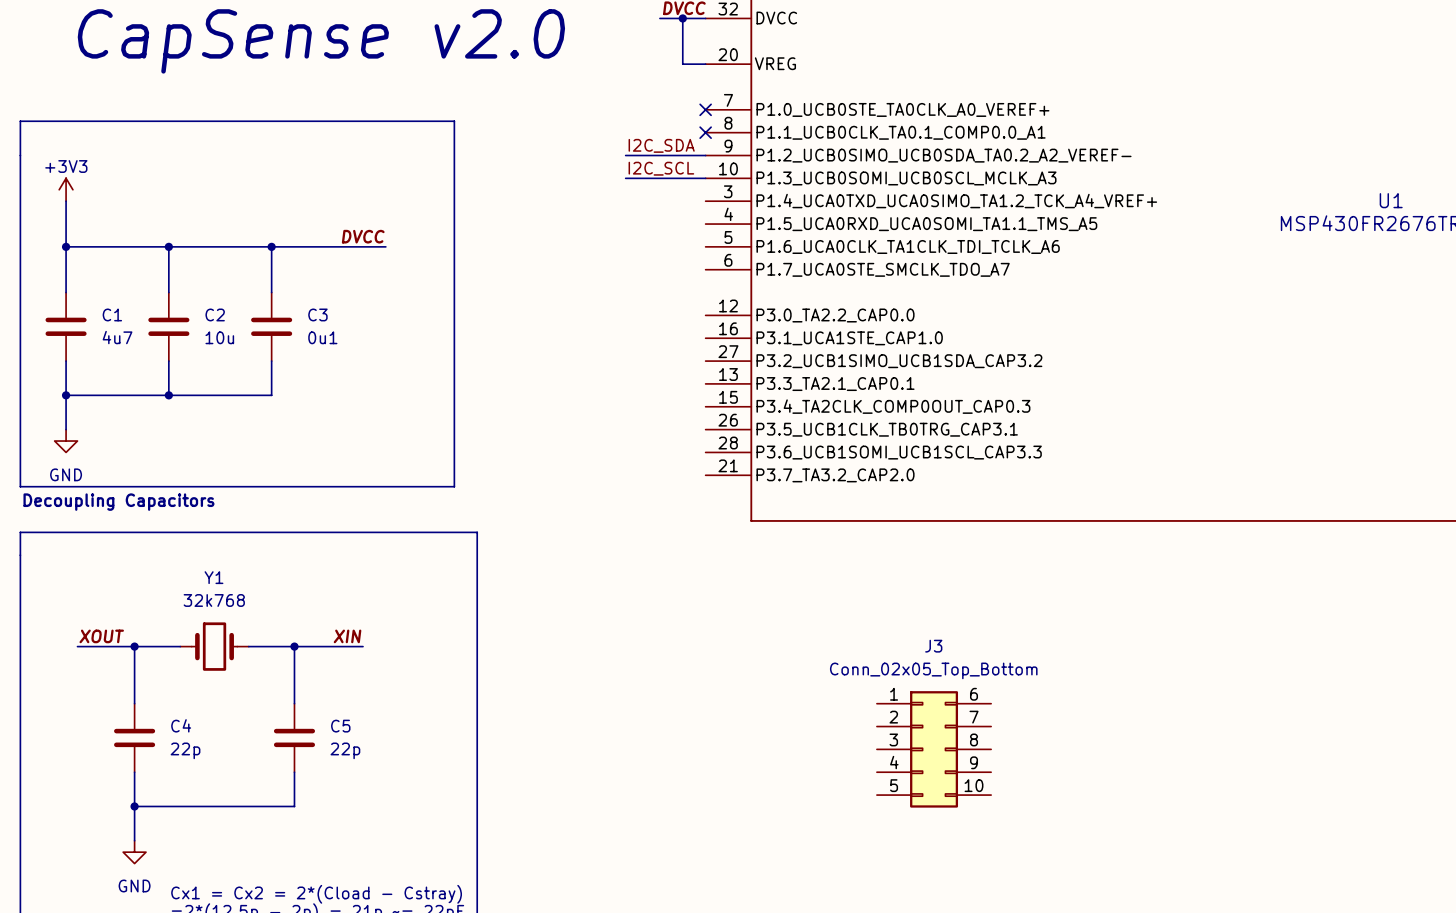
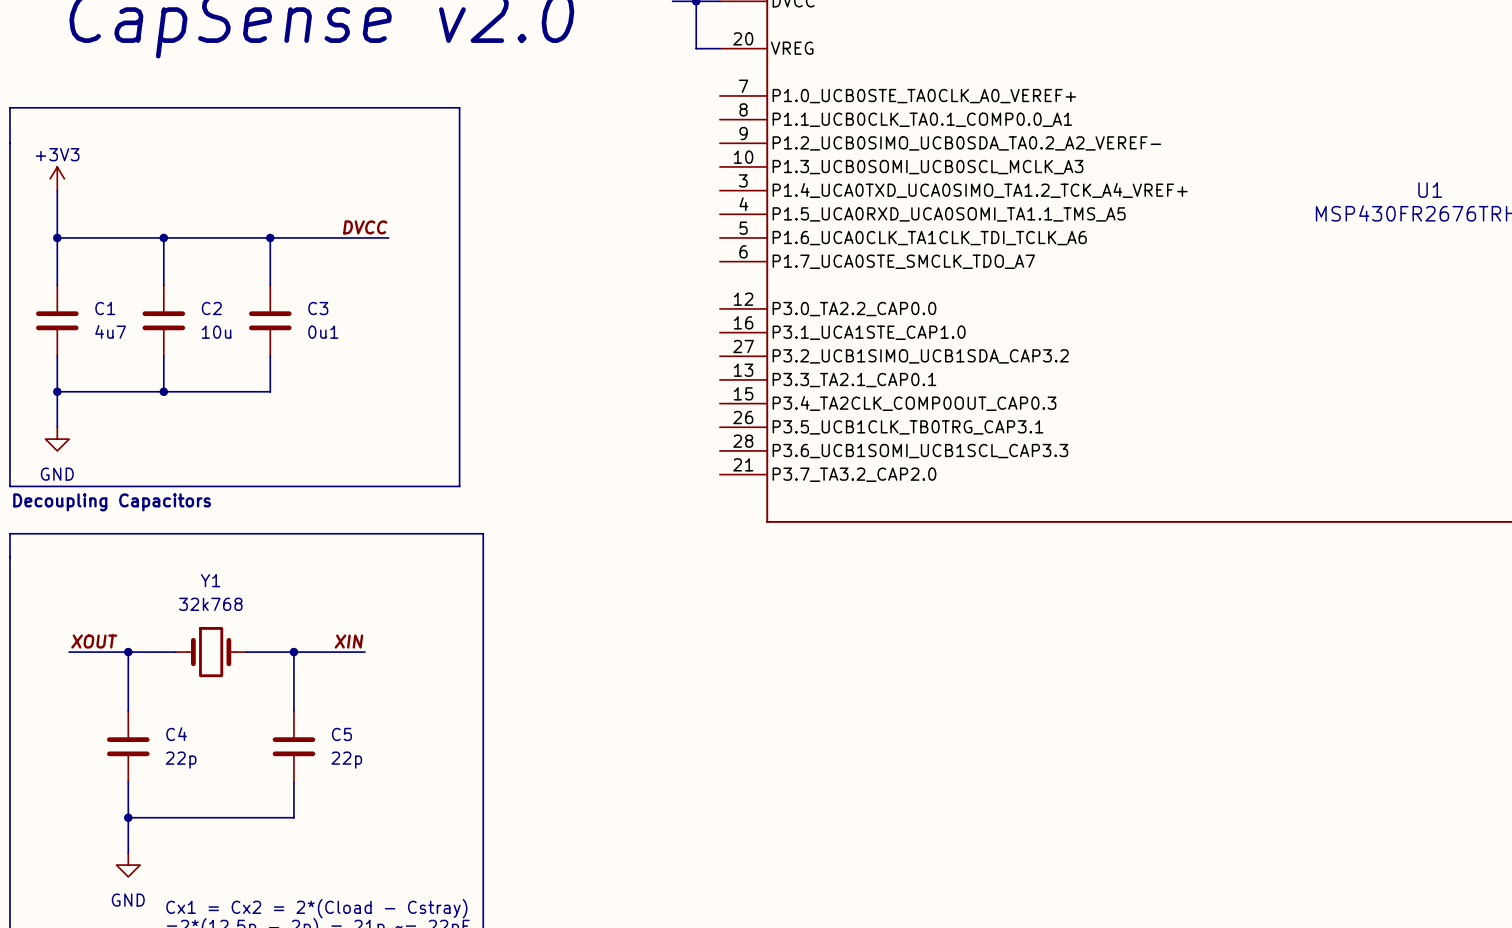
no-connect mark: (705, 109) -> none
no-connect mark: (705, 132) -> none
label: I2C_SDA (661, 145) -> none
wire: (625, 155) (705, 155) -> none
label: I2C_SCL (661, 168) -> none
wire: (625, 178) (705, 178) -> none
J3: Conn_02x05_Top_Bottom (934, 749) -> none

